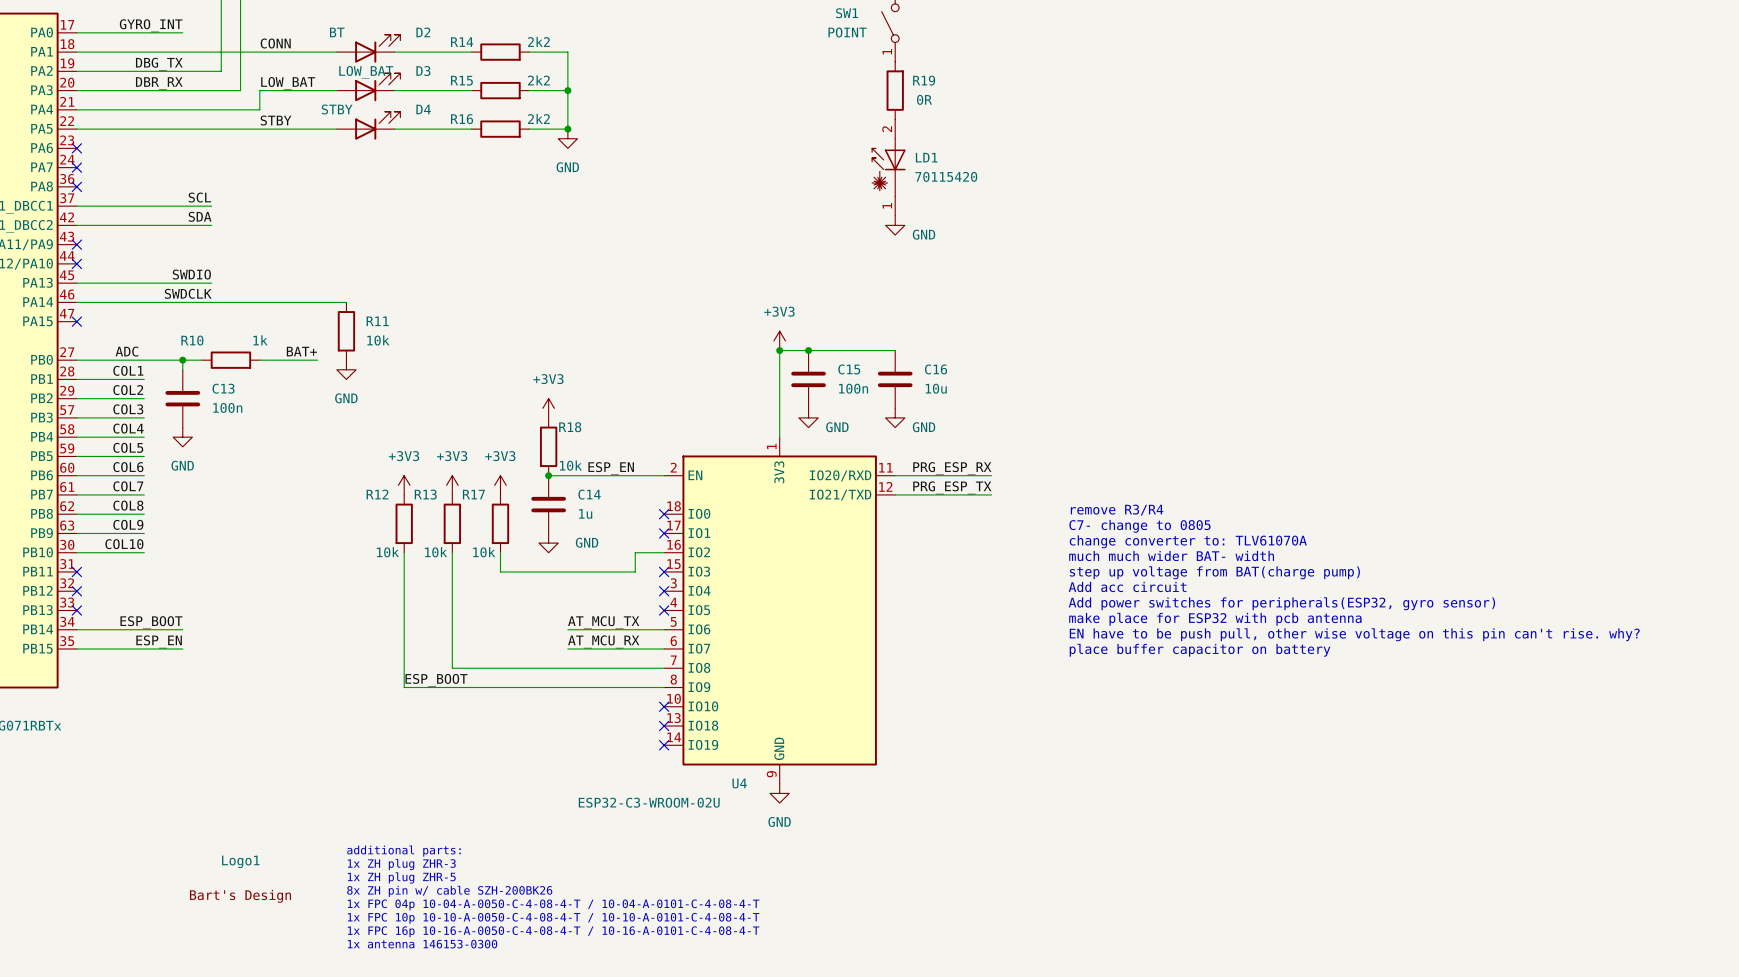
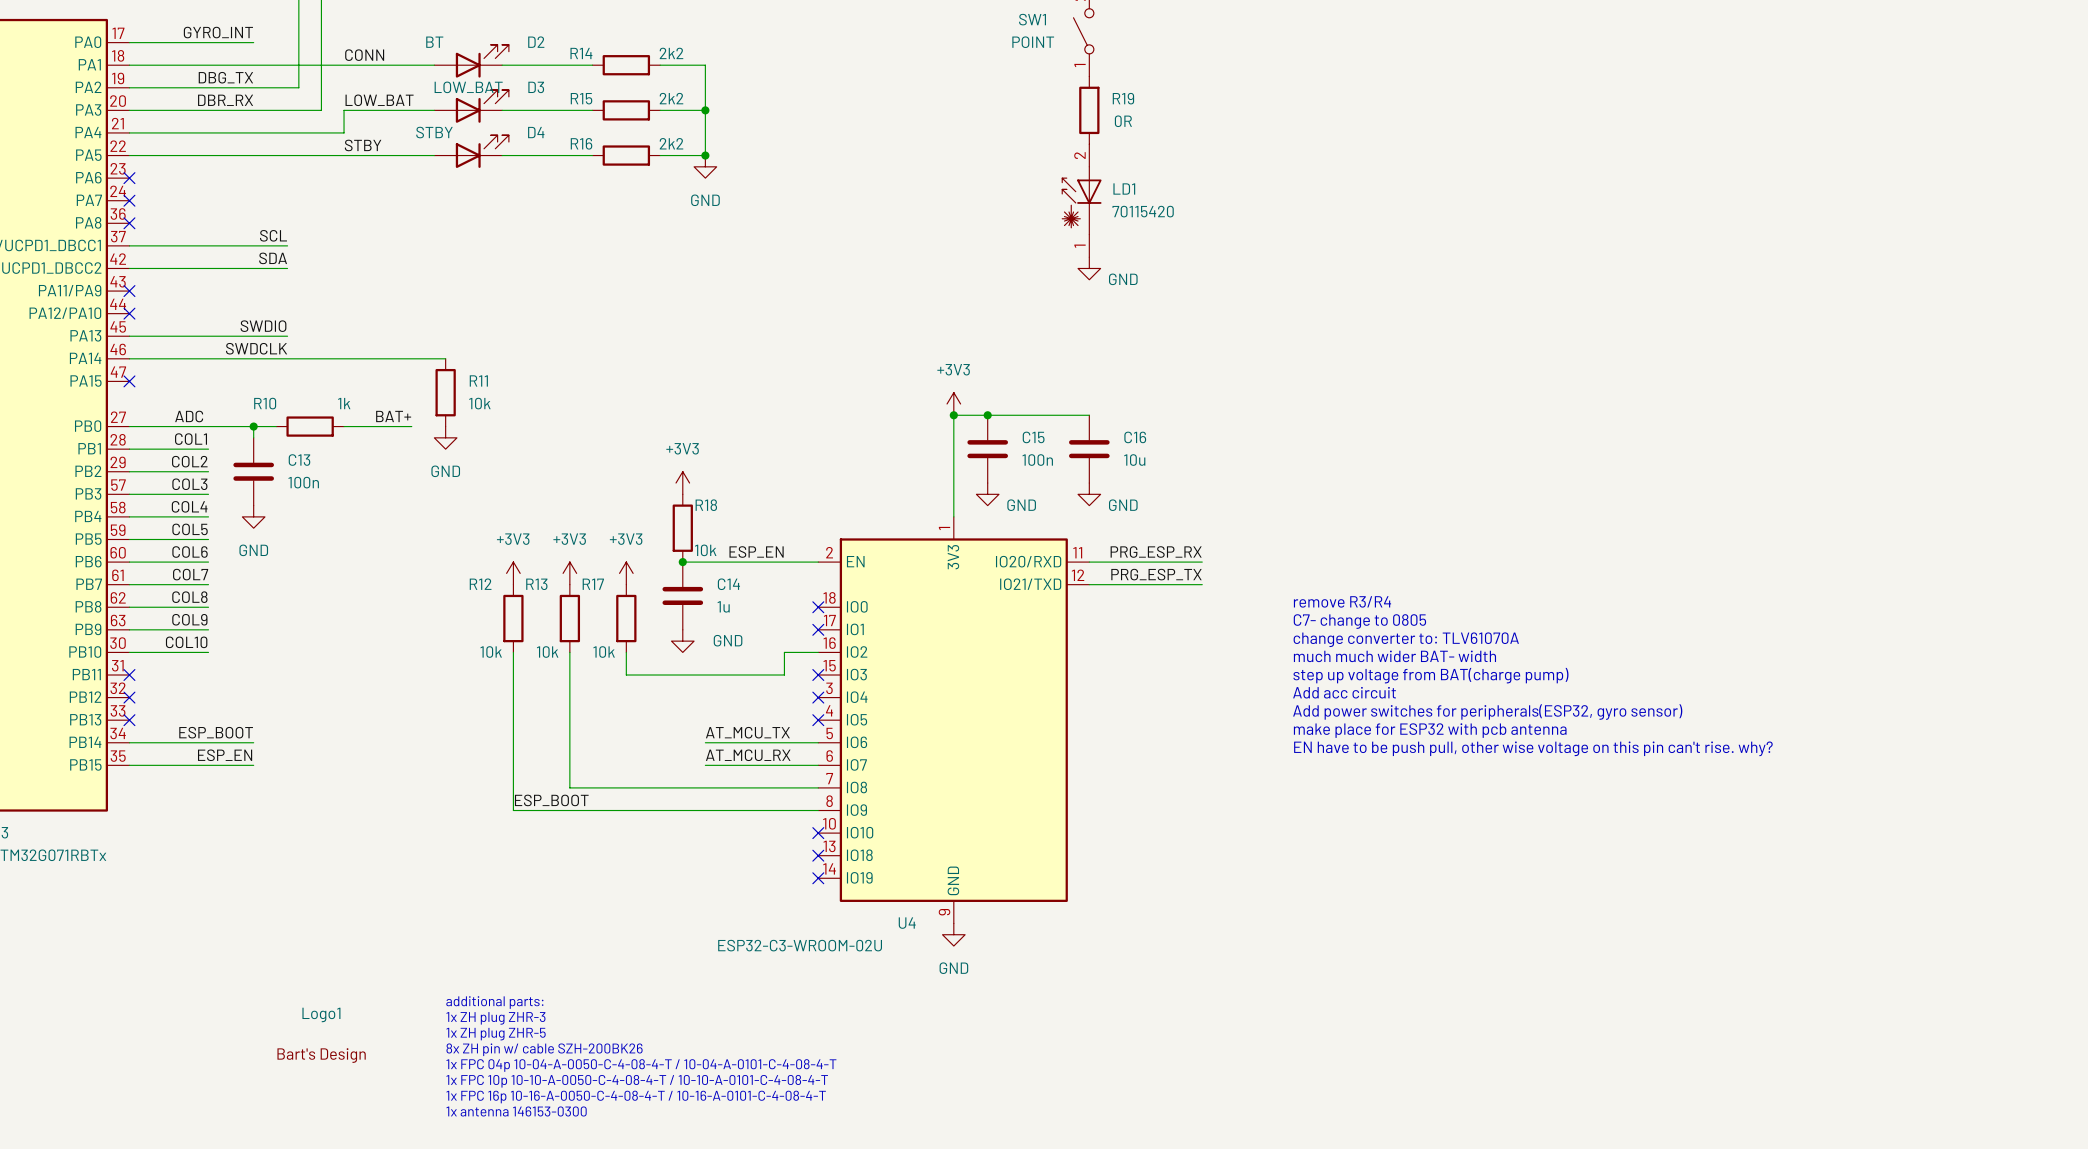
text: place buffer capacitor on battery (1200, 650) -> none

